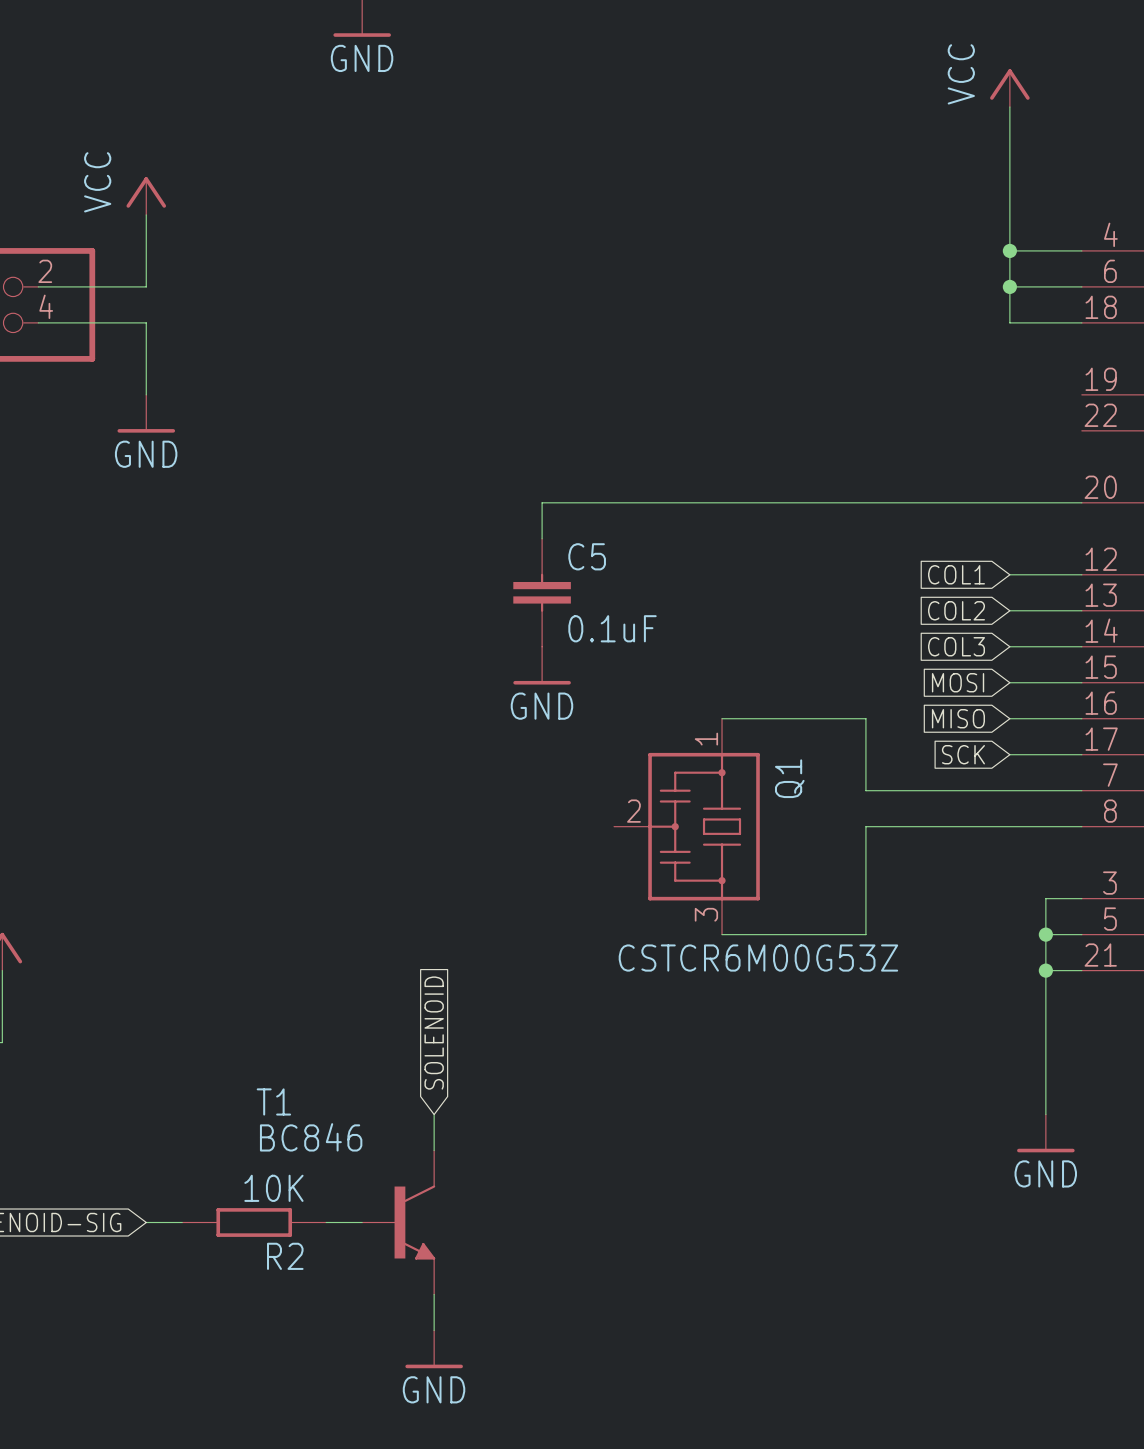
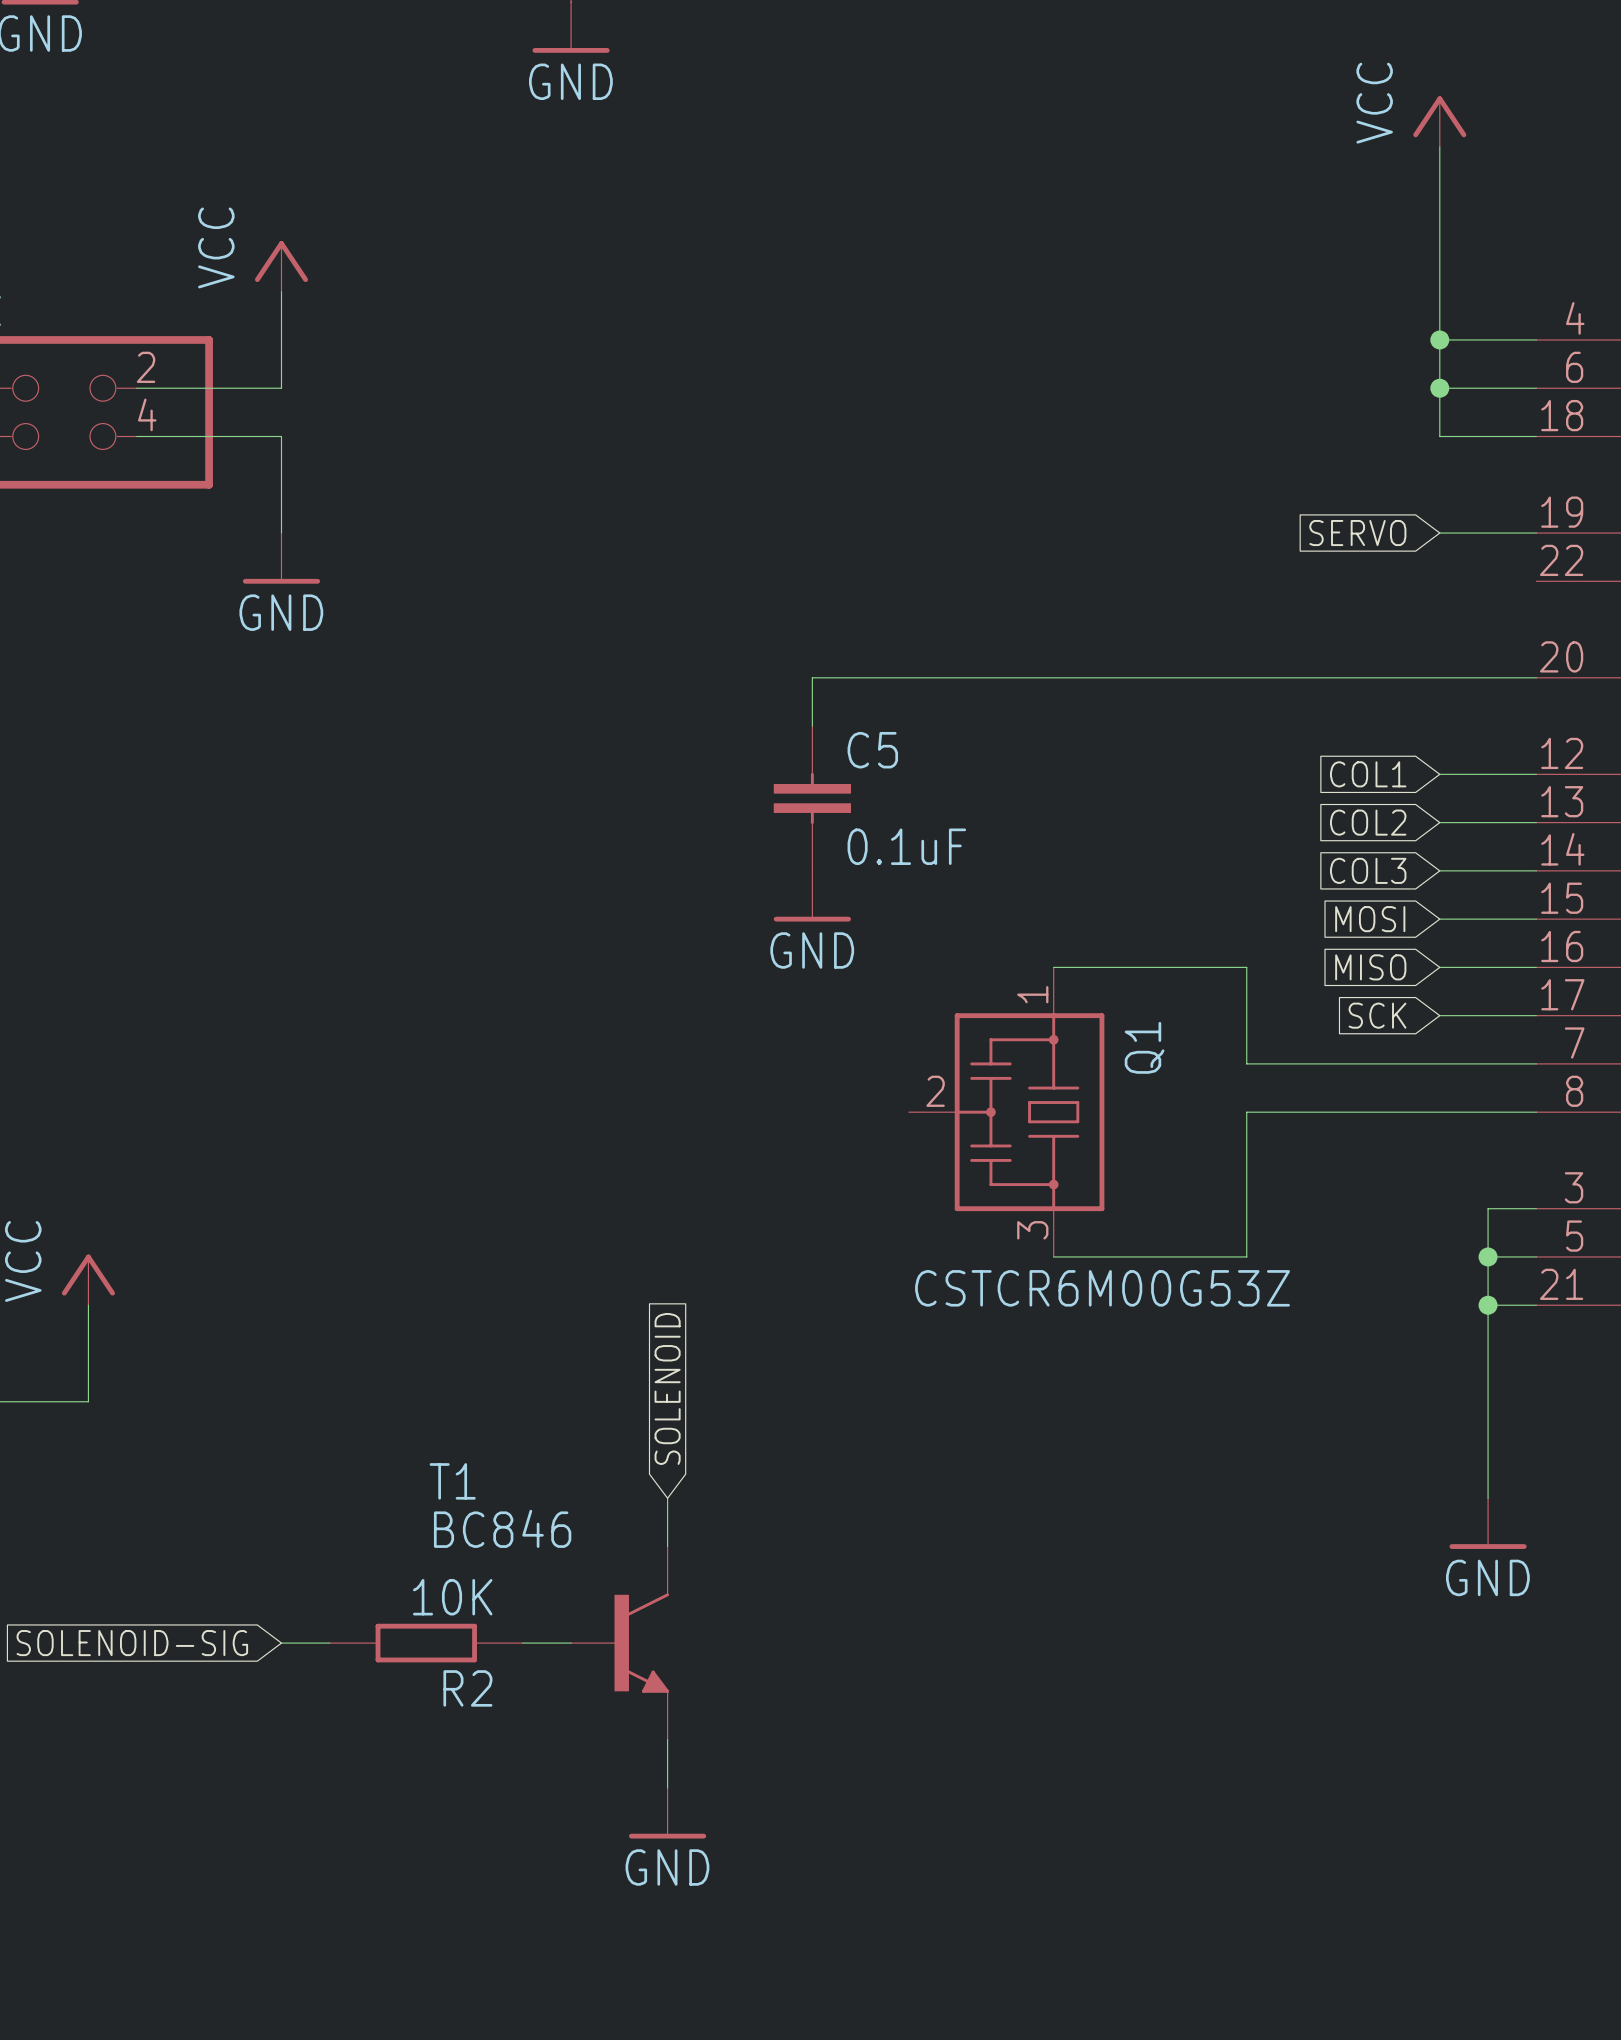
global label: none -> SERVO (1357, 533)
wire: none -> (1439, 533) (1536, 533)

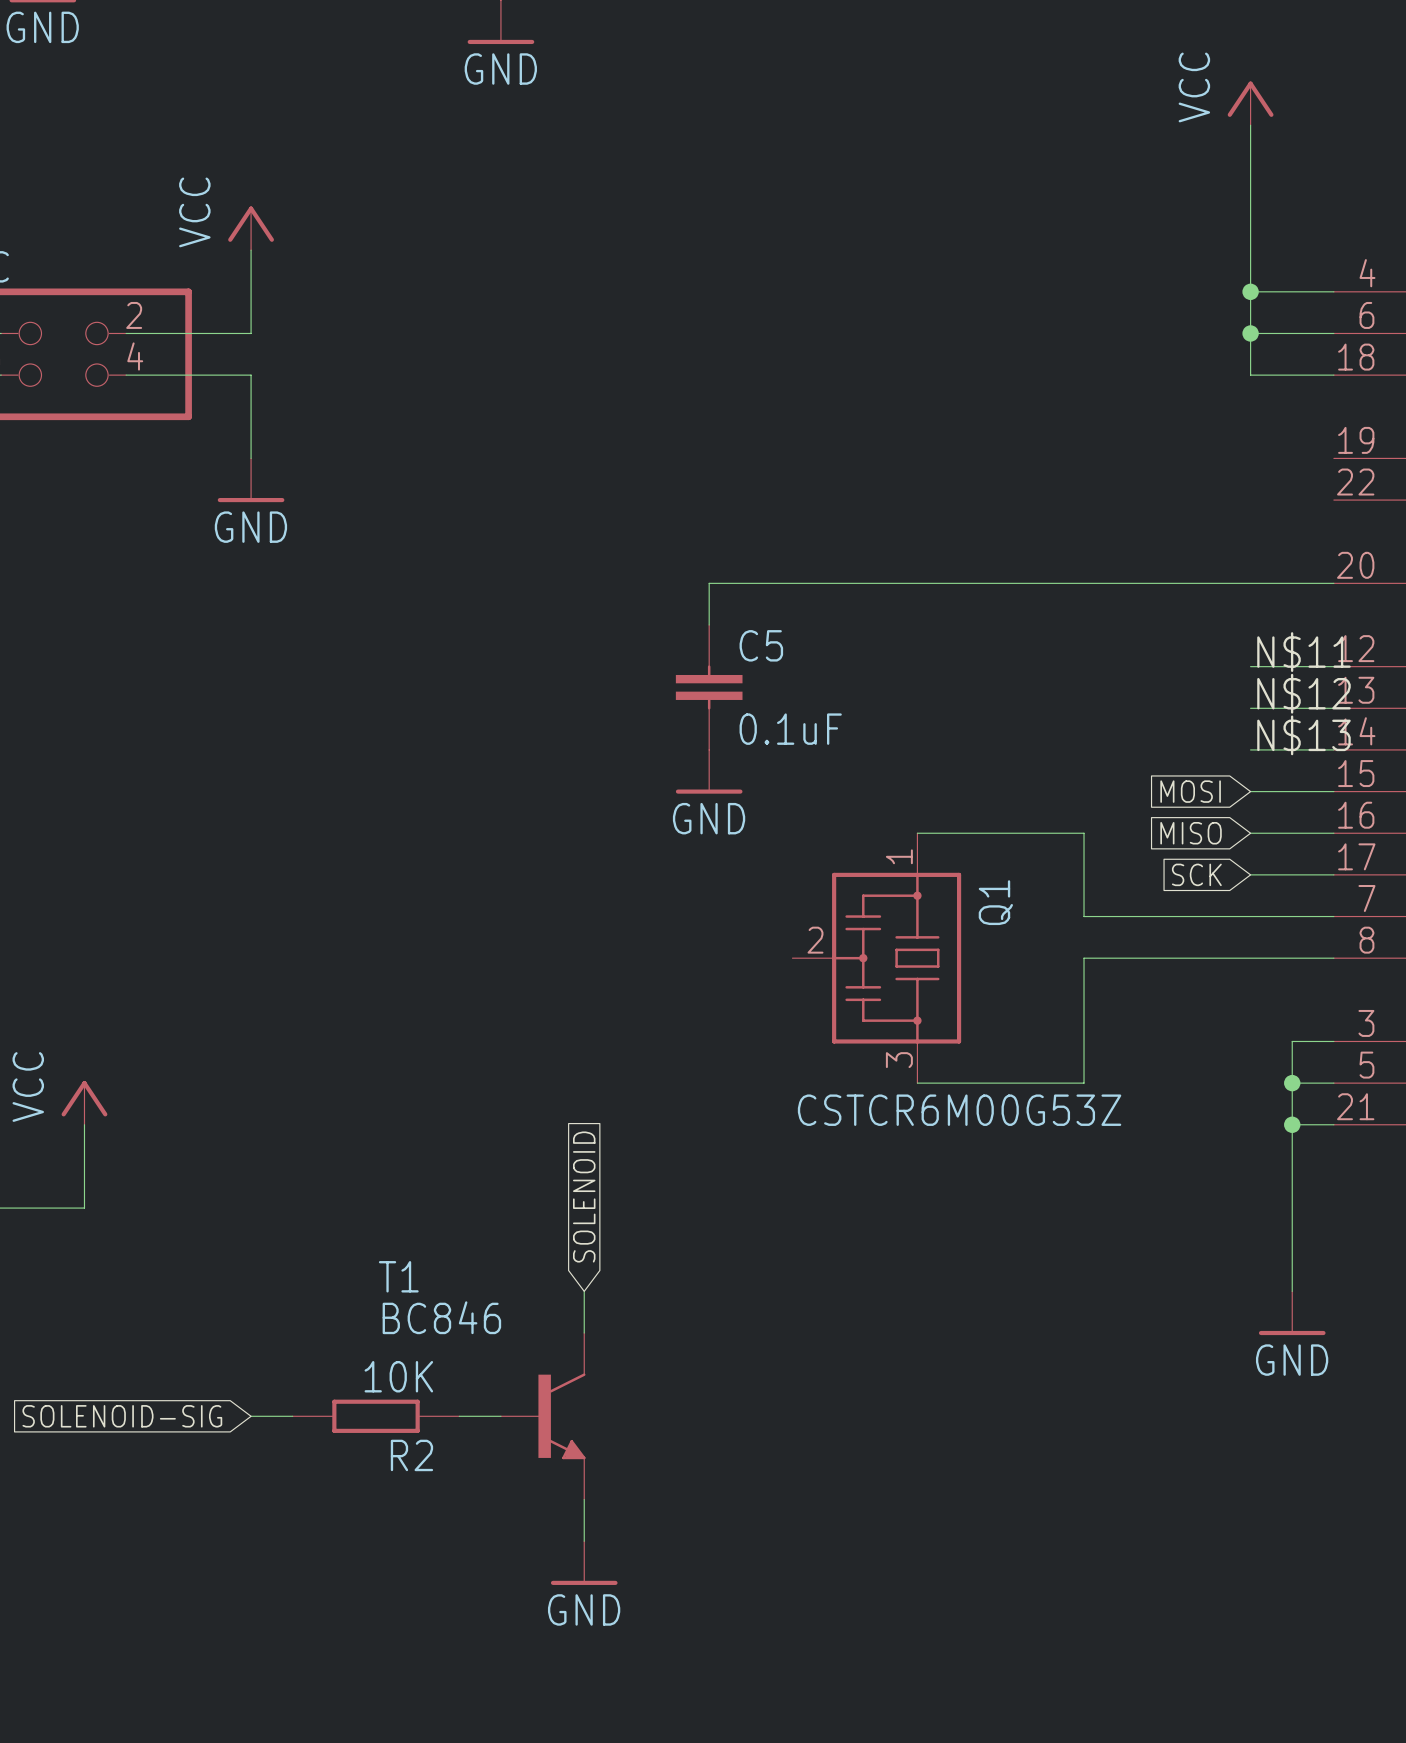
global label: SERVO (1357, 533) -> none
wire: (1439, 533) (1536, 533) -> none
label: none -> N$11 (1303, 652)
global label: COL1 (1368, 774) -> none
label: none -> N$12 (1303, 693)
global label: COL2 (1368, 822) -> none
label: none -> N$13 (1303, 735)
global label: COL3 (1368, 870) -> none

